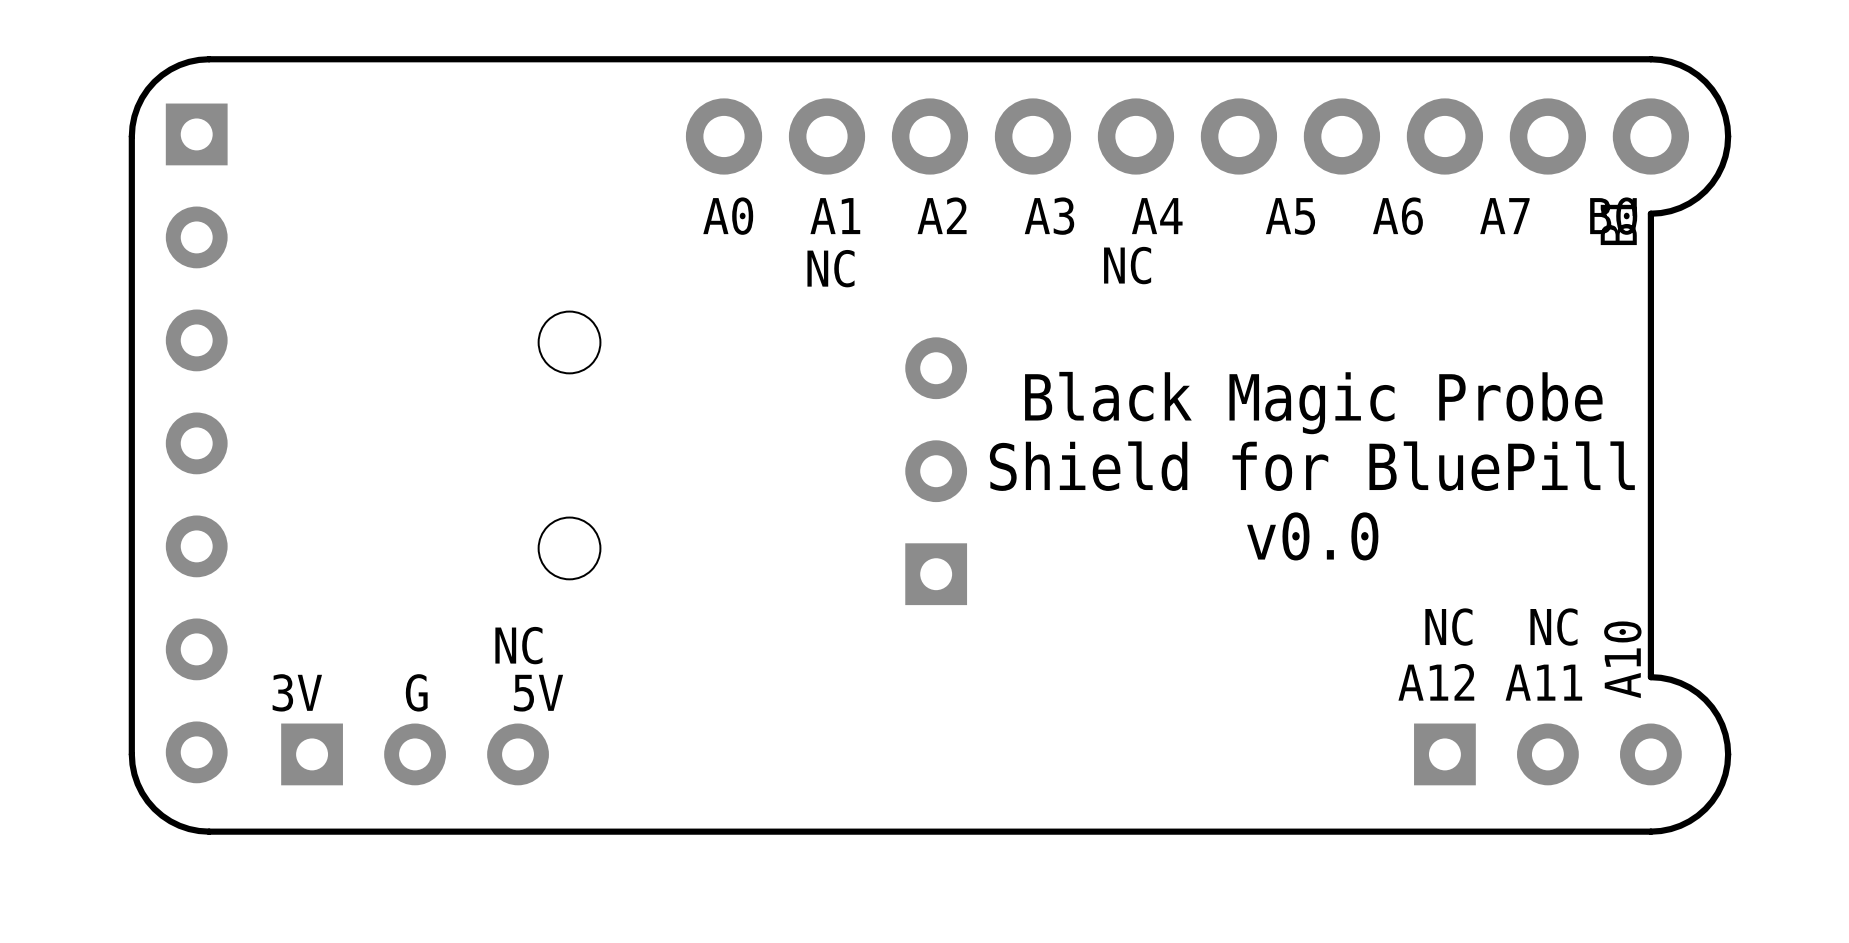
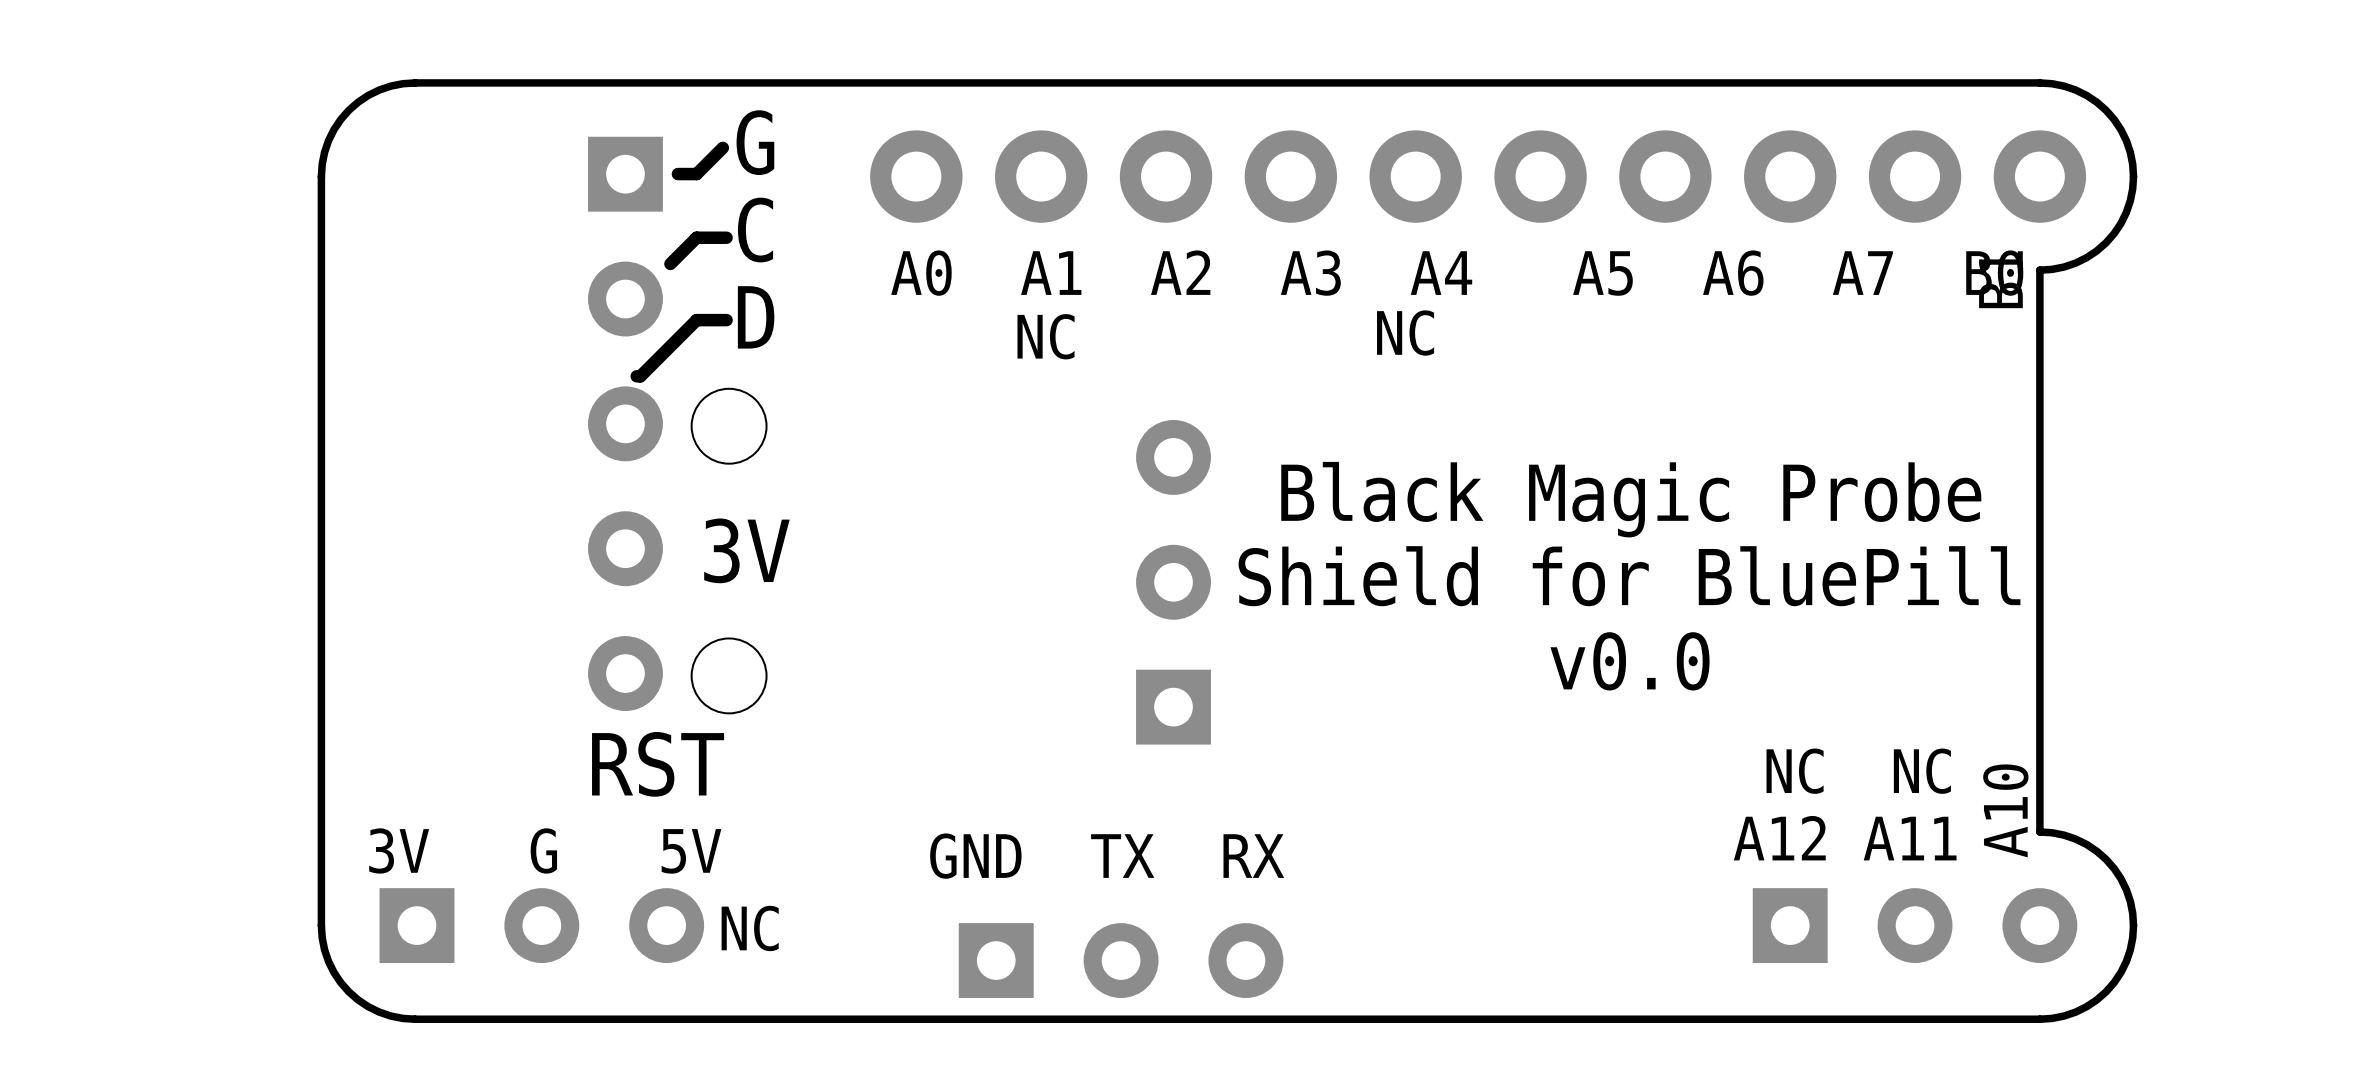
board edge: (310, 59) (209, 59) (179, 65) (162, 75) (142, 97) (134, 116) (131, 136) (131, 754) (134, 774) (142, 793) (154, 809) (170, 821) (189, 829) (209, 831) (310, 831) -> (415, 82) (390, 86) (379, 90) (368, 95) (348, 110) (333, 129) (328, 140) (324, 152) (321, 176) (322, 937) (324, 949) (333, 972) (340, 982) (358, 999) (368, 1006) (390, 1016) (415, 1019)
text: none -> G (755, 142)
line: none -> (722, 147) (696, 174) (677, 174)
text: none -> C (755, 230)
line: none -> (726, 237) (696, 237) (670, 263)
text: none -> D (756, 317)
line: none -> (726, 320) (696, 320) (640, 376) (636, 376)
part: none -> (625, 423)
part: (196, 443) -> none
text: none -> 3V (746, 550)
text: none -> RST (658, 764)
text position: NC (518, 645) -> NC (750, 928)
text: none -> GND TX RX (1107, 856)
part: none -> (1121, 960)

